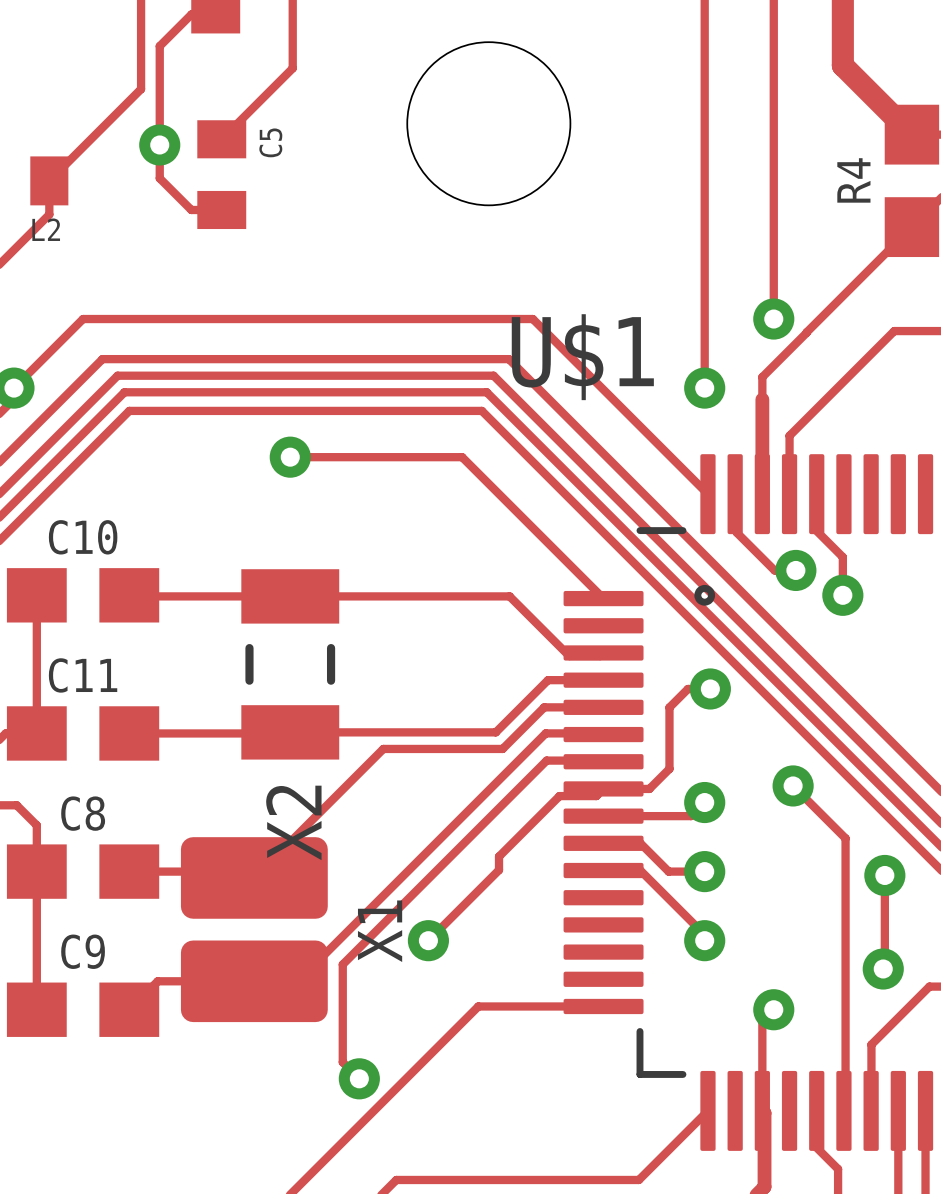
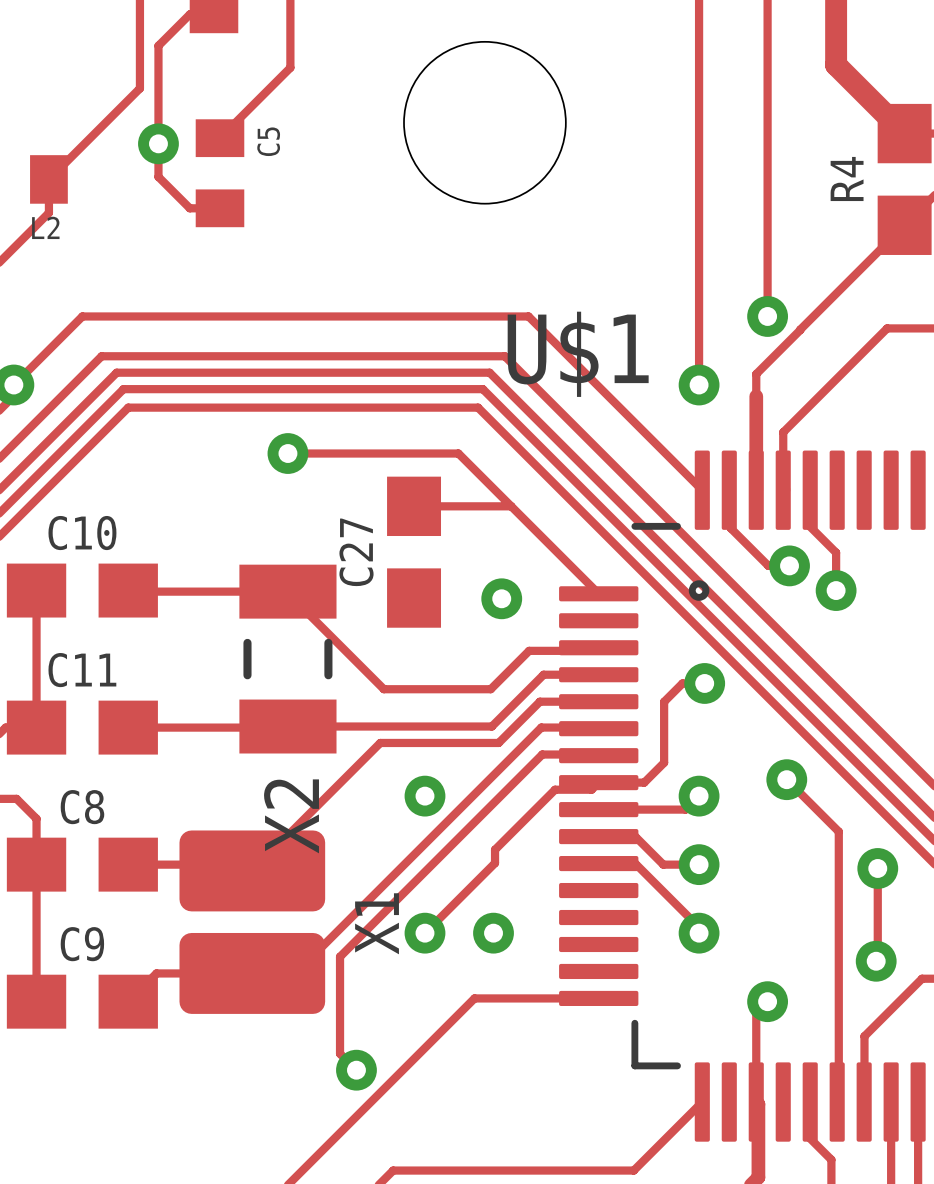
track: none -> (414, 506) (511, 506)
C27: none -> (414, 552)
track: (290, 596) (509, 596) (569, 656) -> (287, 591) (383, 689) (490, 689) (529, 650) (564, 650)
via: none -> (501, 598)
via: none -> (424, 796)
via: none -> (493, 933)

